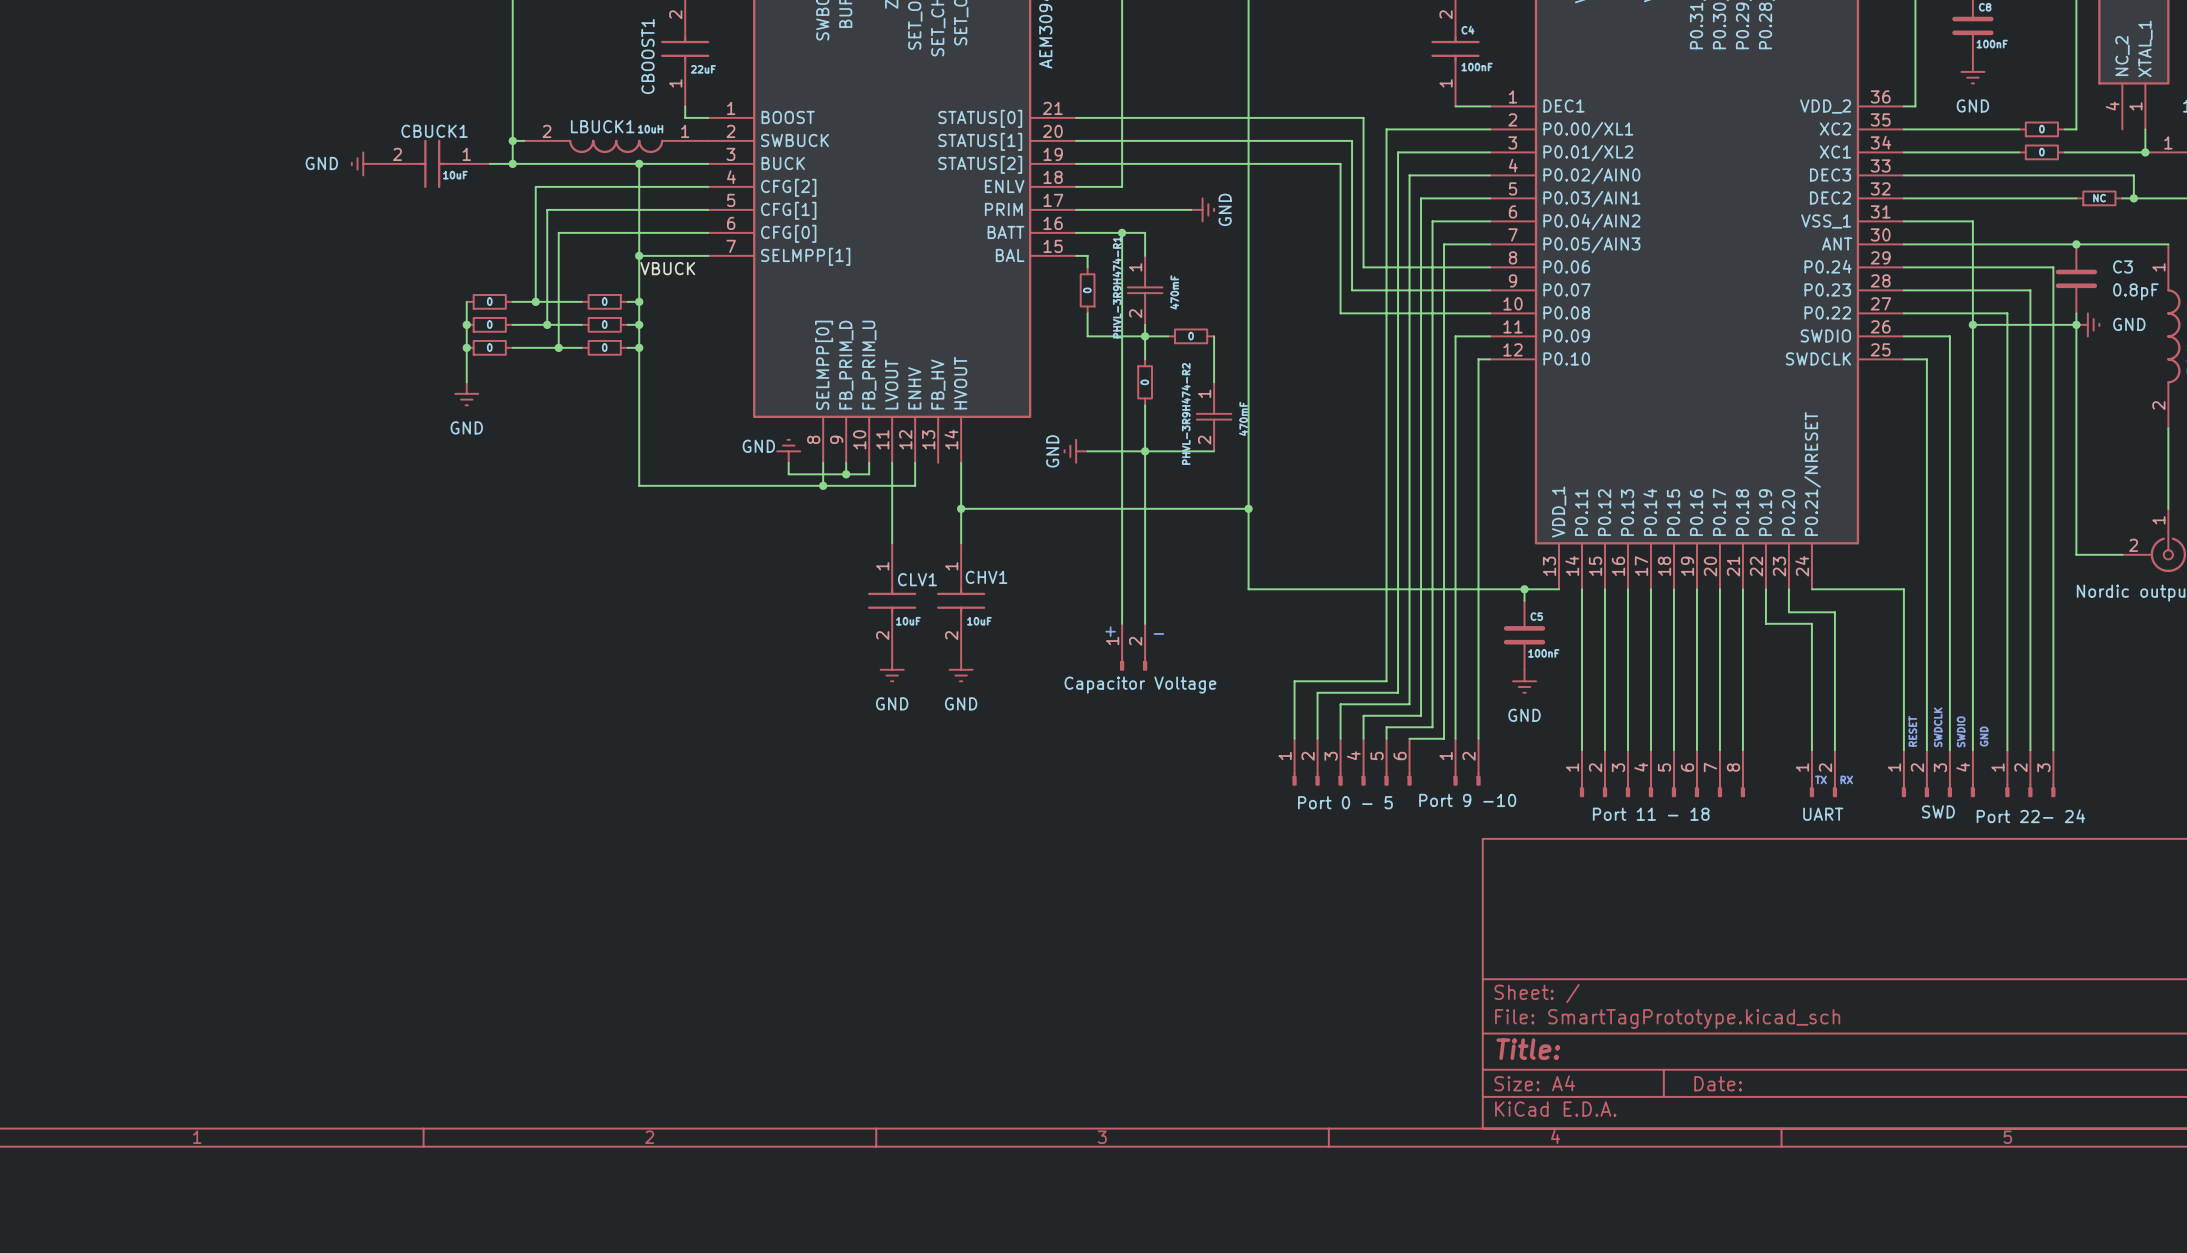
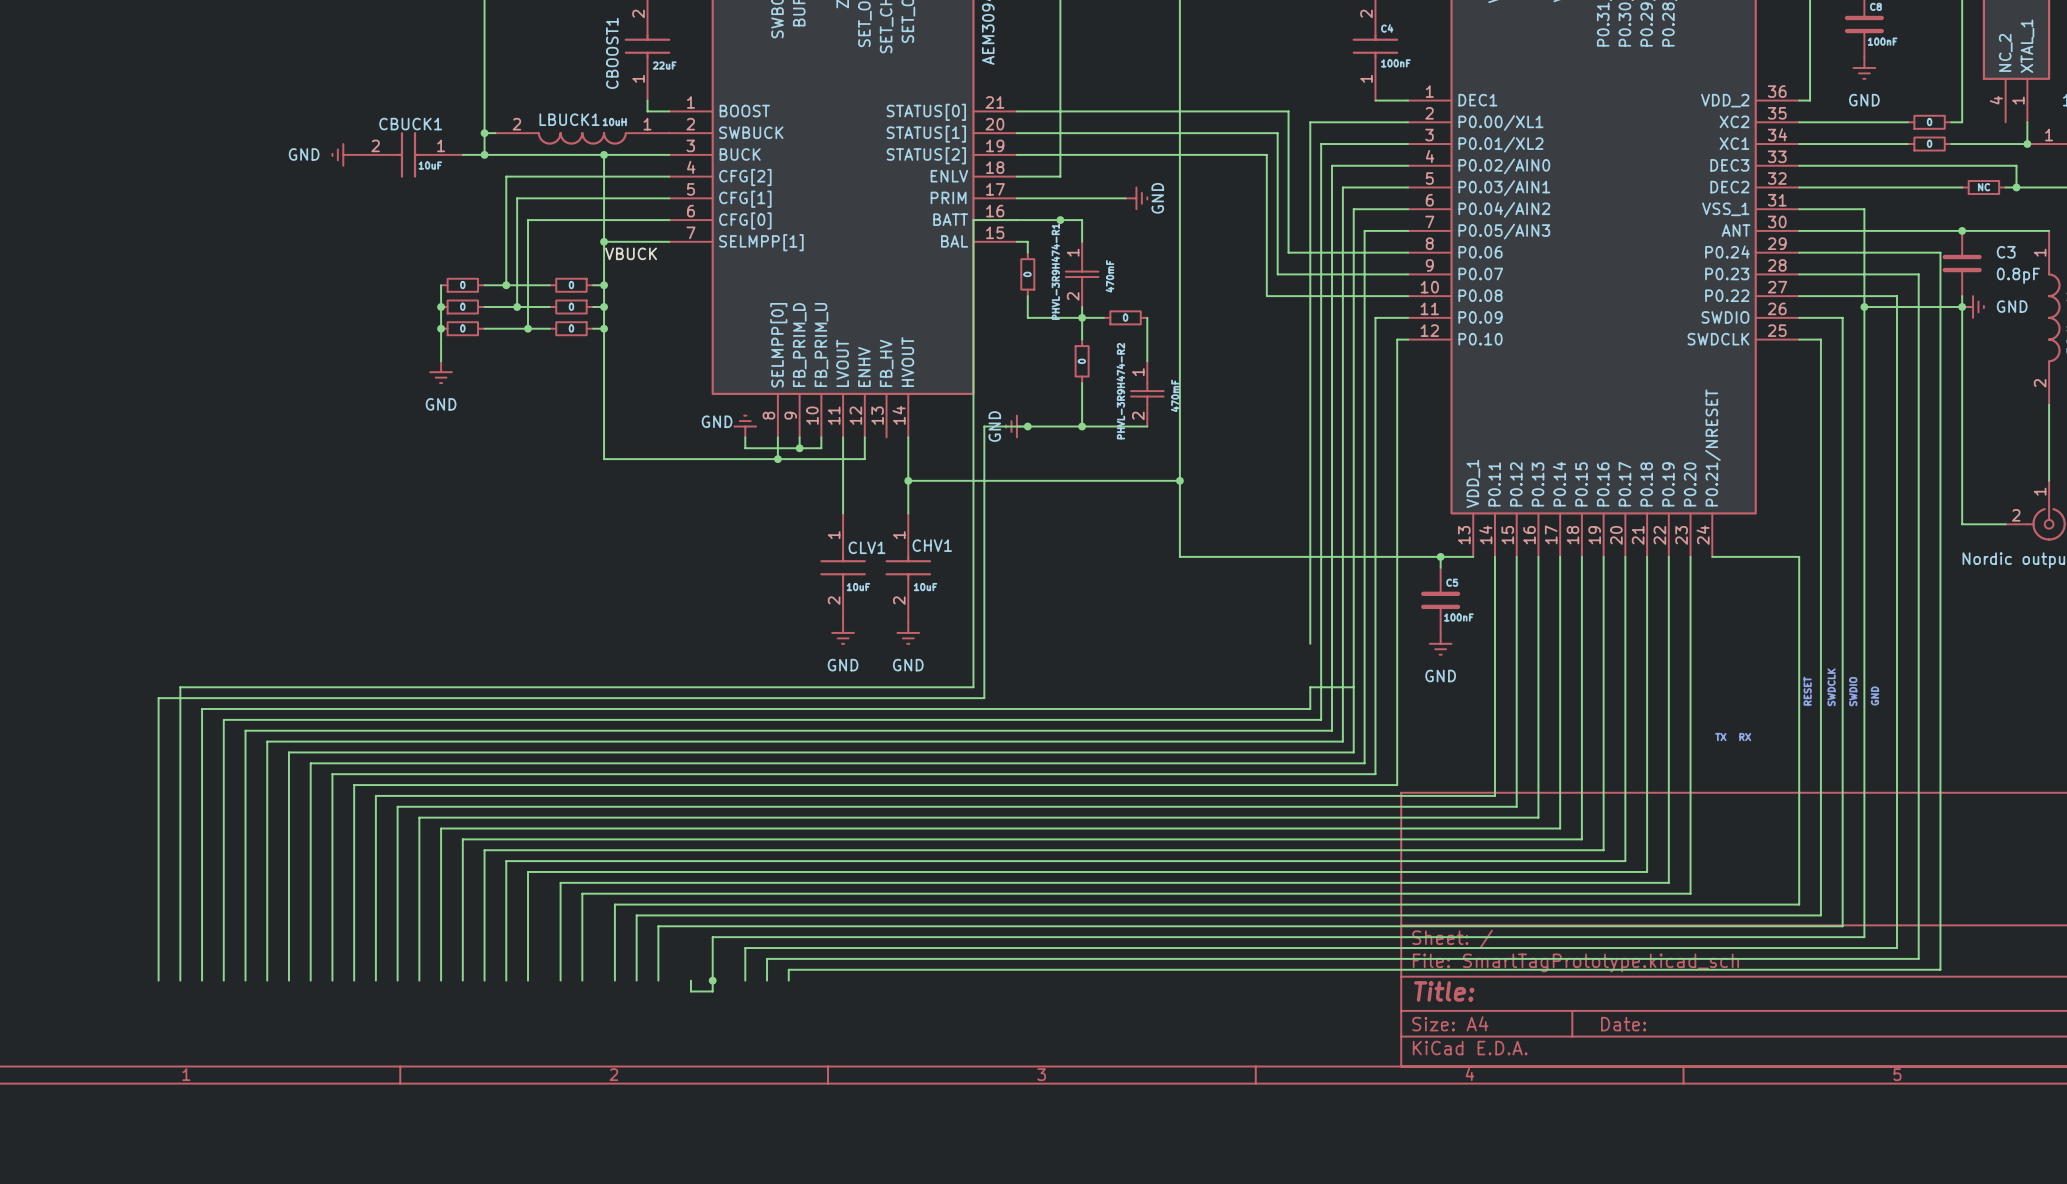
wire: none -> (1016, 220) (973, 220) (973, 687) (180, 687) (180, 980)
wire: (1122, 232) (1122, 623) -> none
wire: none -> (1027, 426) (984, 426) (984, 698) (158, 698) (158, 980)
junction: none -> (1027, 426)
wire: (1145, 451) (1145, 623) -> none
wire: (1788, 612) (1834, 612) (1834, 750) -> (1690, 578) (1690, 893) (582, 893) (582, 980)
wire: (1765, 623) (1811, 623) (1811, 750) -> (1668, 589) (1668, 882) (560, 882) (560, 980)
text: + (1110, 631) -> none
text: - (1158, 633) -> none
part: Capacitor Voltage (1133, 647) -> none
wire: (1386, 681) (1294, 681) (1294, 738) -> none
wire: (1398, 692) (1317, 692) (1317, 738) -> (1321, 654) (1321, 719) (223, 719) (223, 980)
wire: (1409, 704) (1340, 704) (1340, 738) -> (1332, 665) (1332, 730) (245, 730) (245, 980)
wire: (1421, 715) (1363, 715) (1363, 738) -> (1342, 676) (1342, 741) (267, 741) (267, 980)
wire: none -> (1353, 687) (1353, 752) (288, 752) (288, 980)
wire: none -> (1310, 698) (1310, 709) (202, 709) (202, 980)
wire: (1409, 738) (1444, 738) -> (310, 980) (310, 763) (1364, 763) (1364, 698)
wire: none -> (1375, 698) (1375, 774) (332, 774) (332, 980)
wire: none -> (1397, 698) (1397, 785) (354, 785) (354, 980)
wire: none -> (1494, 709) (1494, 795) (375, 795) (375, 980)
wire: none -> (1516, 709) (1516, 806) (397, 806) (397, 980)
wire: none -> (1538, 709) (1538, 817) (419, 817) (419, 980)
wire: none -> (1560, 709) (1560, 828) (441, 828) (441, 980)
wire: none -> (1581, 709) (1581, 839) (462, 839) (462, 980)
wire: none -> (1603, 709) (1603, 850) (484, 850) (484, 980)
wire: none -> (1625, 709) (1625, 861) (506, 861) (506, 980)
wire: none -> (1647, 709) (1647, 871) (528, 871) (528, 980)
wire: none -> (1799, 709) (1799, 904) (614, 904) (614, 980)
wire: none -> (1820, 709) (1820, 915) (636, 915) (636, 980)
wire: none -> (1842, 709) (1842, 926) (658, 926) (658, 980)
wire: none -> (1864, 709) (1864, 937) (712, 937) (712, 991) (690, 991) (690, 980)
wire: none -> (1896, 709) (1896, 948) (745, 948) (745, 980)
wire: none -> (1918, 709) (1918, 958) (767, 958) (767, 980)
wire: none -> (1940, 709) (1940, 969) (788, 969) (788, 980)
part: Port 0 - 5 (1352, 762) -> none
part: Port 9 -10 (1467, 762) -> none
part: Port 11 - 18 (1662, 773) -> none
part: UART (1823, 773) -> none
part: SWD (1938, 773) -> none
part: Port 22- 24 (2030, 773) -> none
junction: none -> (712, 980)

